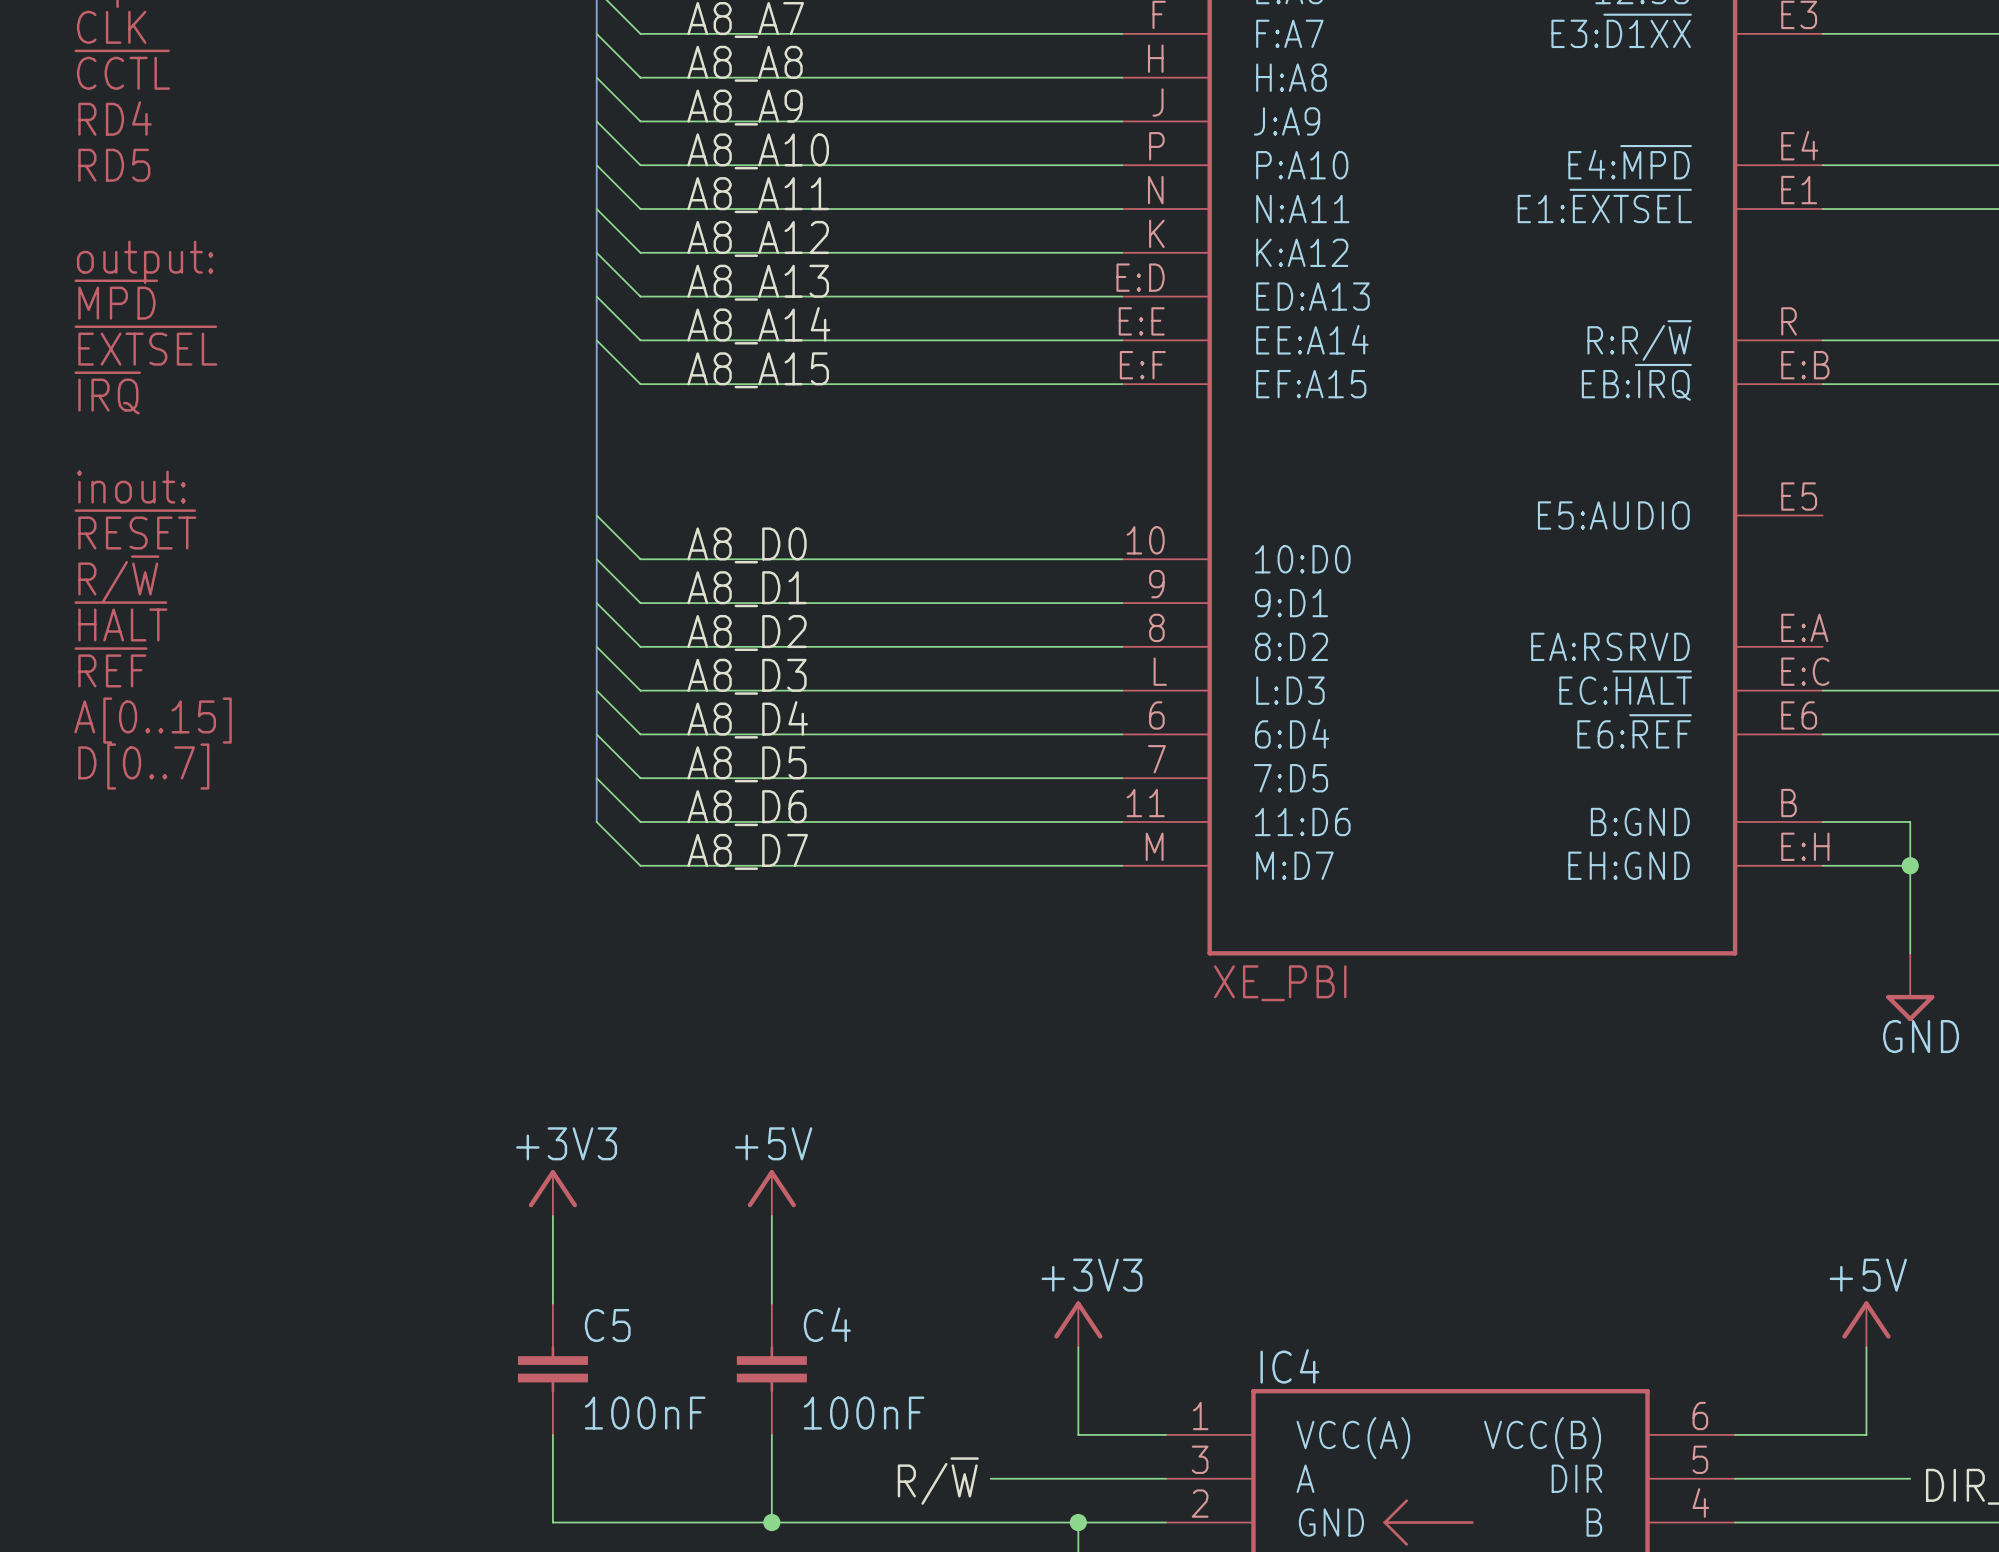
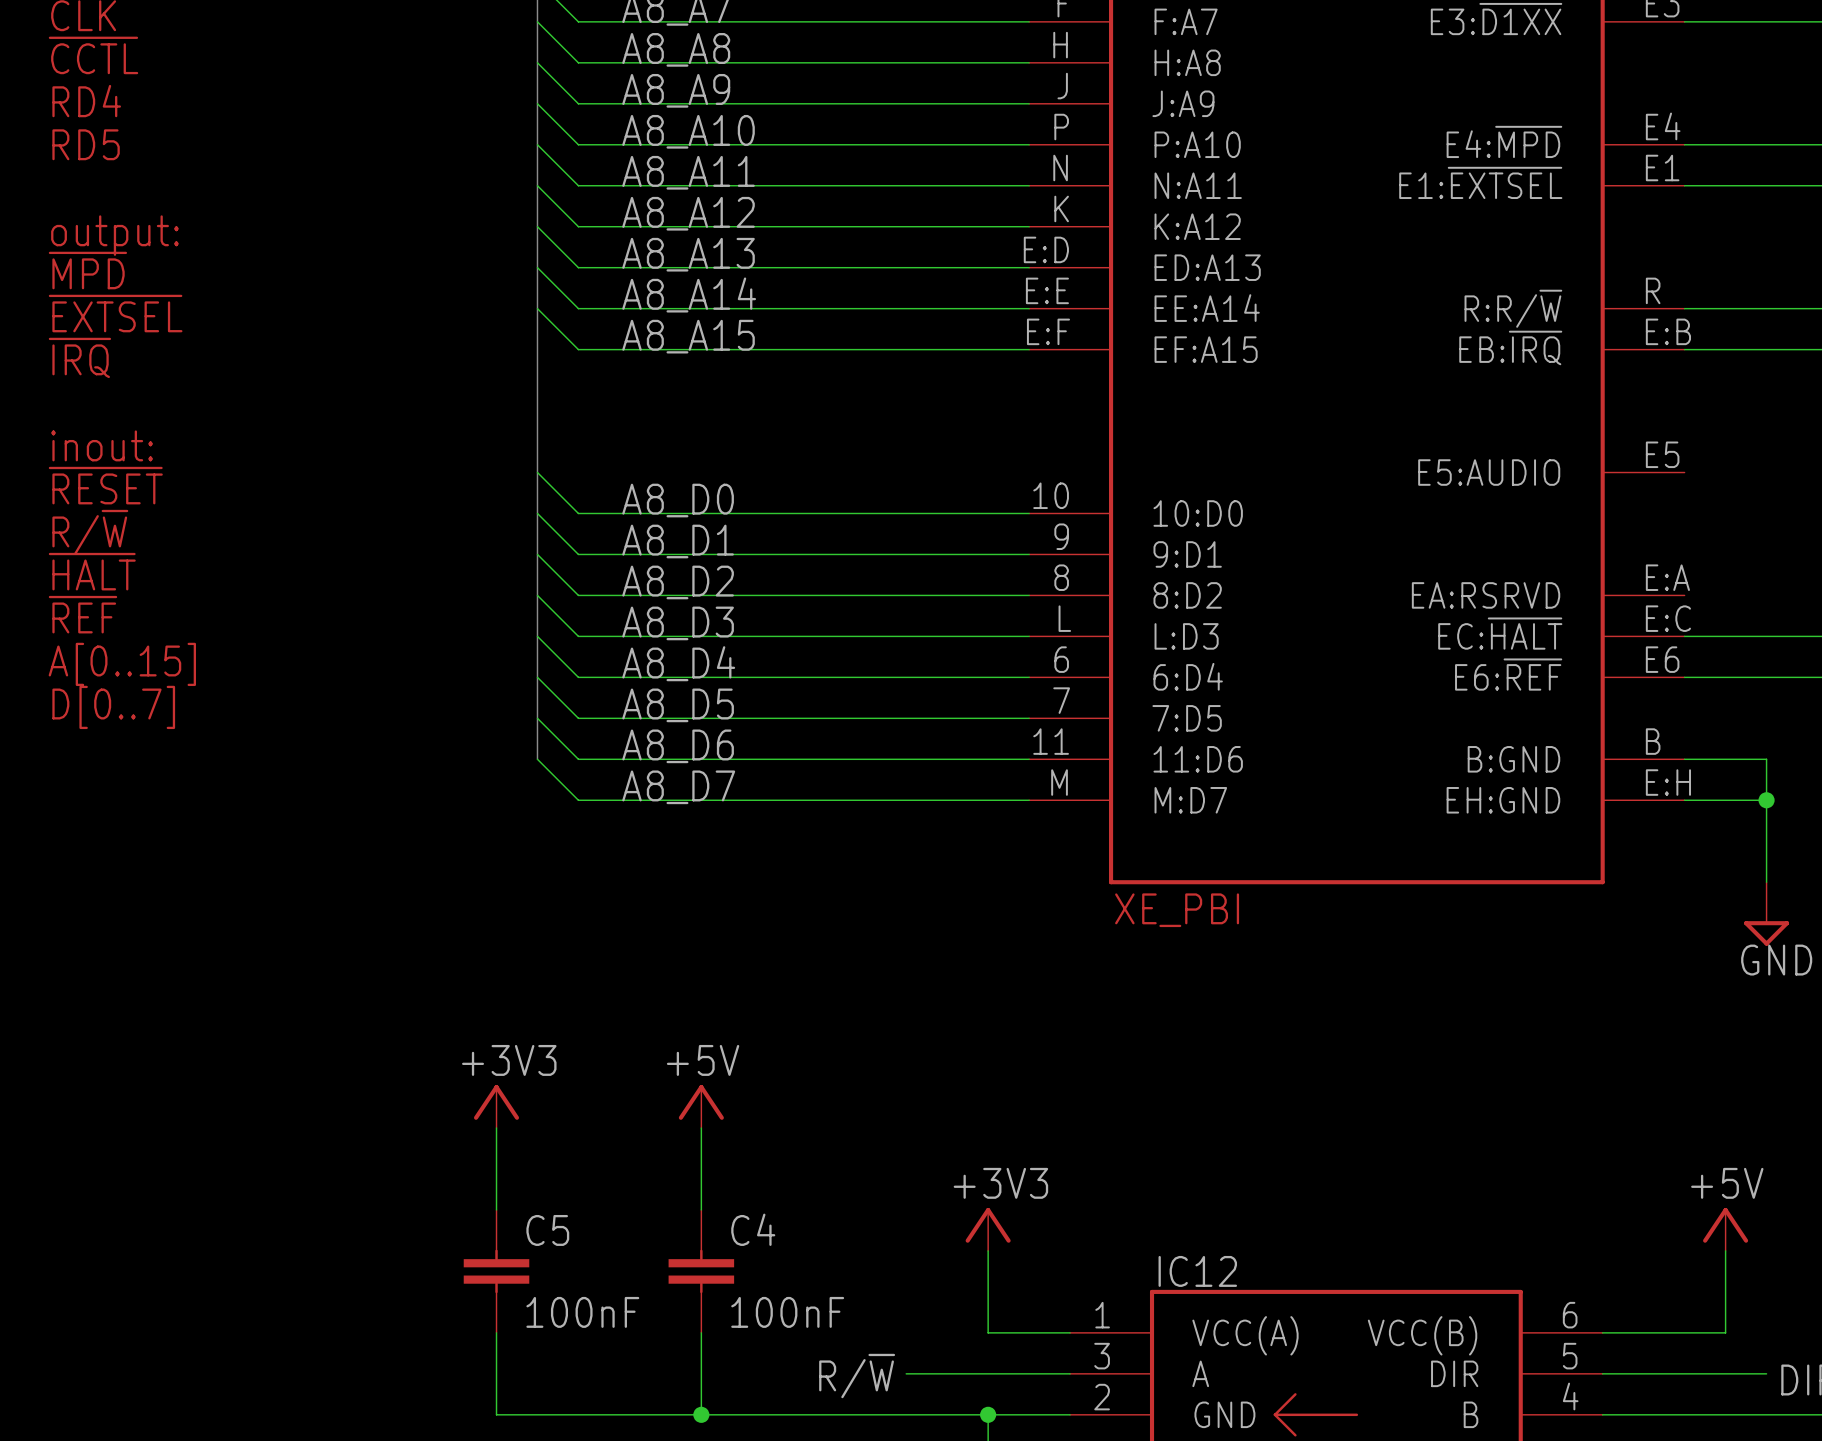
IC4 name: IC4 (1289, 1366) -> IC12 (1197, 1271)

